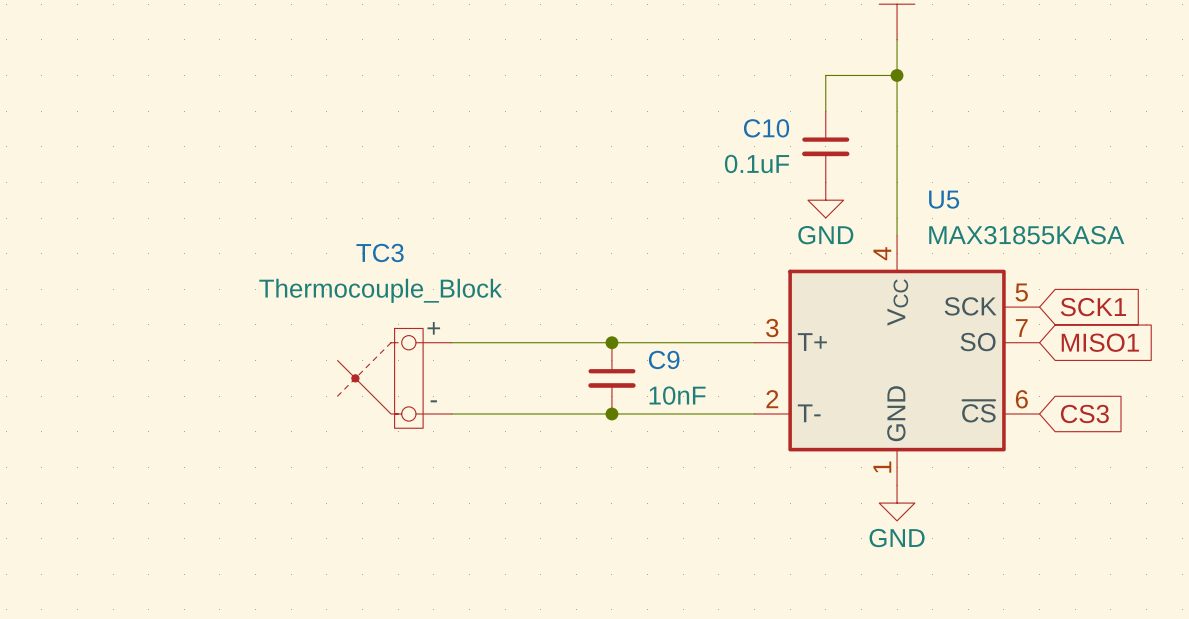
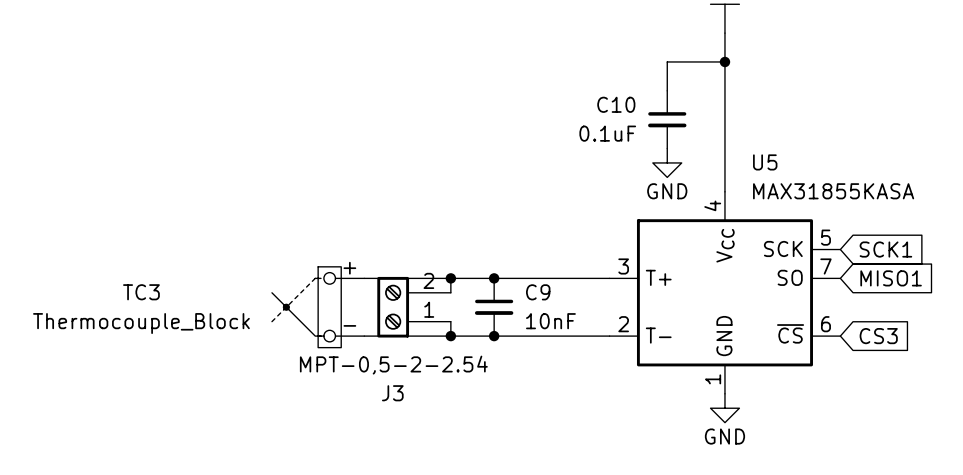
TC3 name position: TC3 (380, 252) -> TC3 (141, 292)
TC3 value position: Thermocouple_Block (380, 290) -> Thermocouple_Block (141, 323)
wire: none -> (450, 278) (450, 292)
junction: none -> (450, 278)
J3: none -> MPT-0,5-2-2.54 (414, 307)
wire: none -> (450, 321) (450, 336)
junction: none -> (450, 336)

